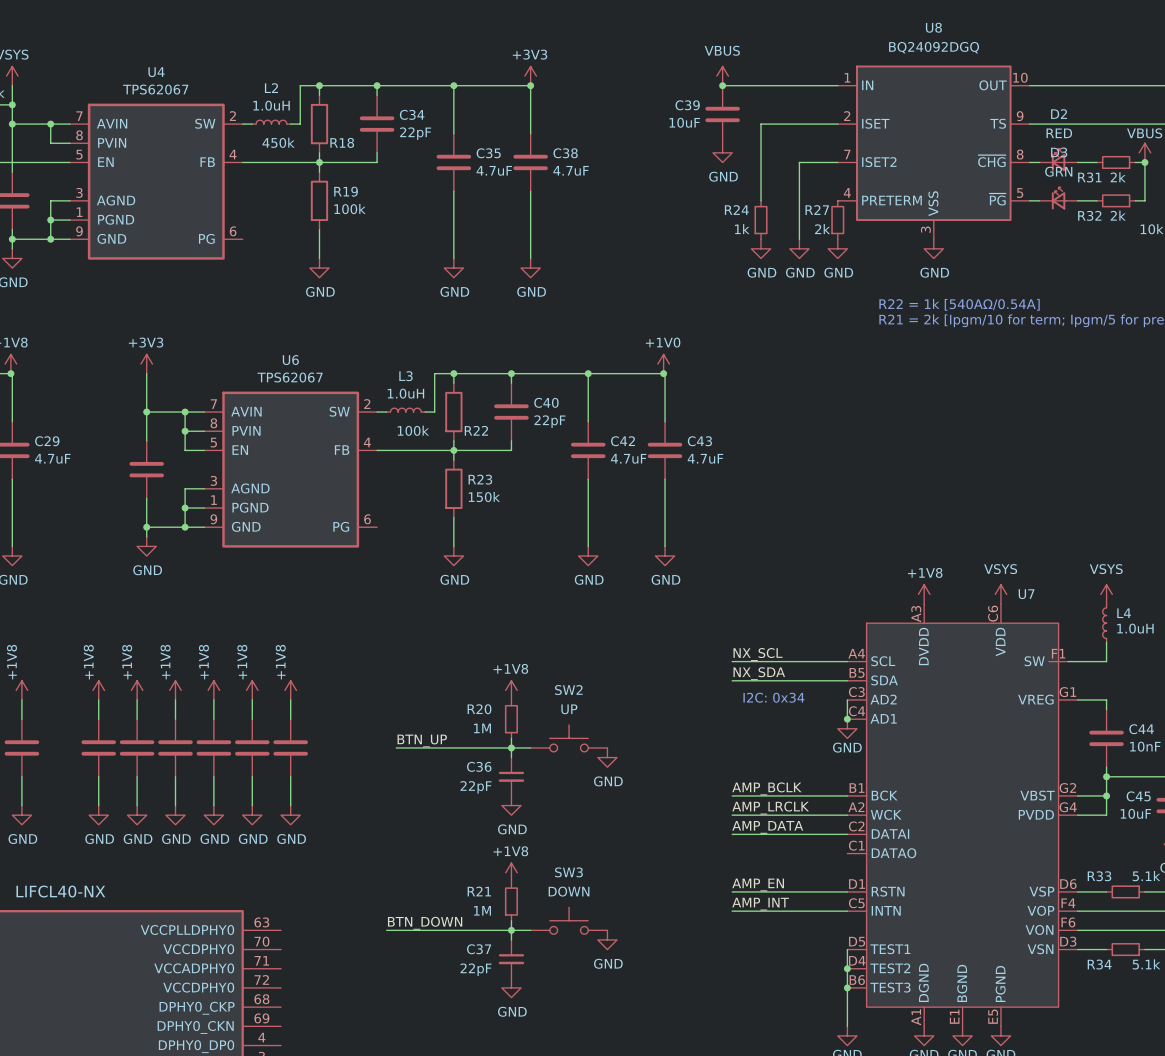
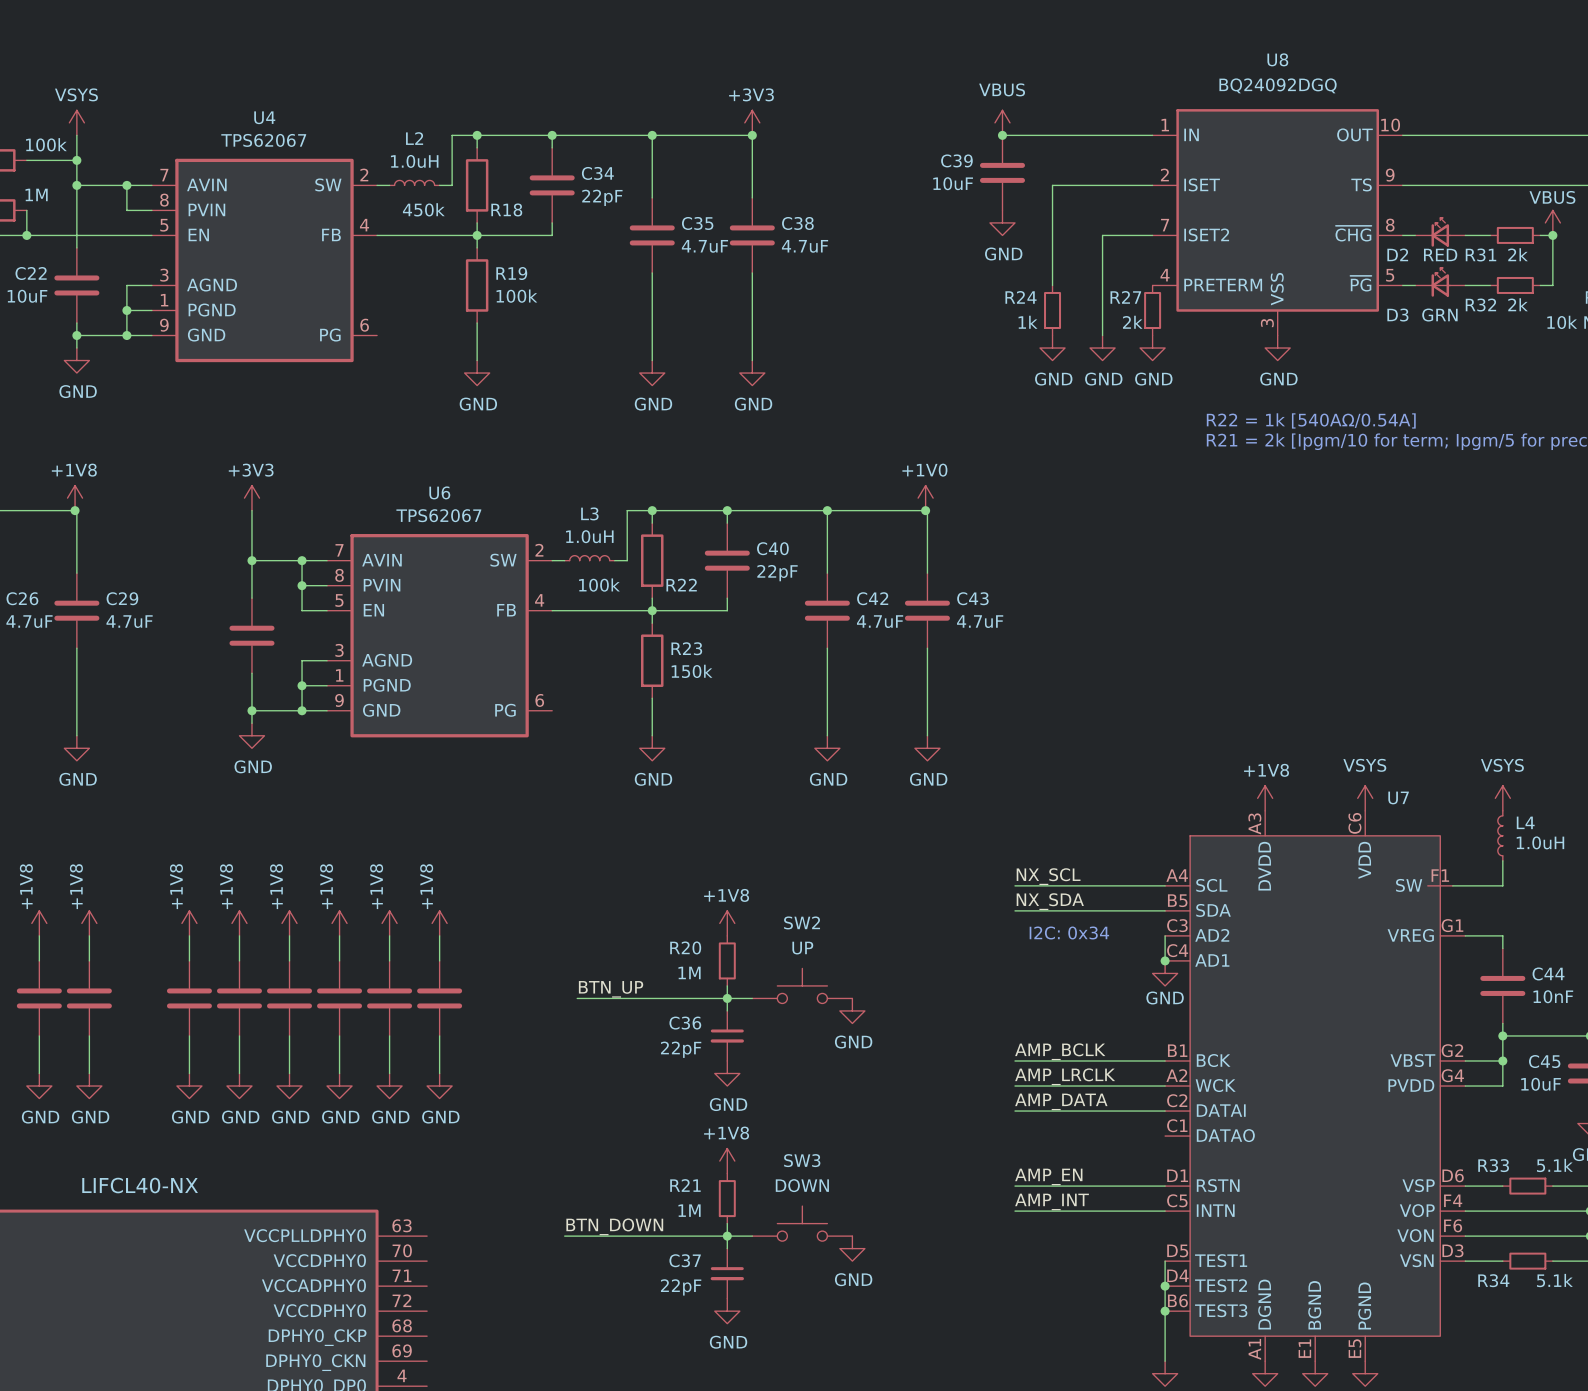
D2 name position: D2 (1059, 114) -> D2 (1397, 254)
D2 value position: RED (1059, 133) -> RED (1440, 254)
D3 name position: D3 (1059, 152) -> D3 (1397, 315)
D3 value position: GRN (1058, 171) -> GRN (1439, 315)

